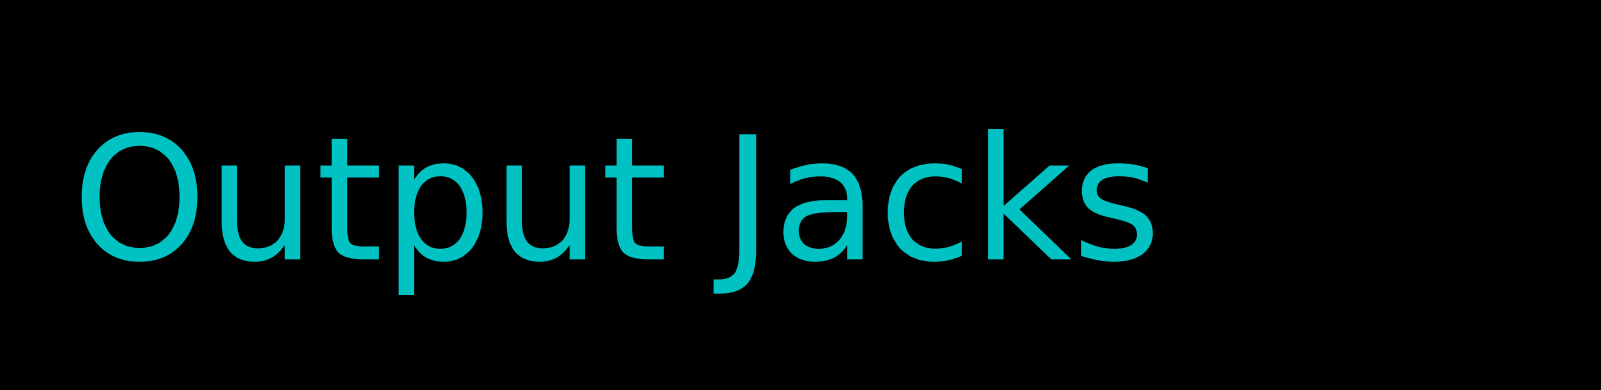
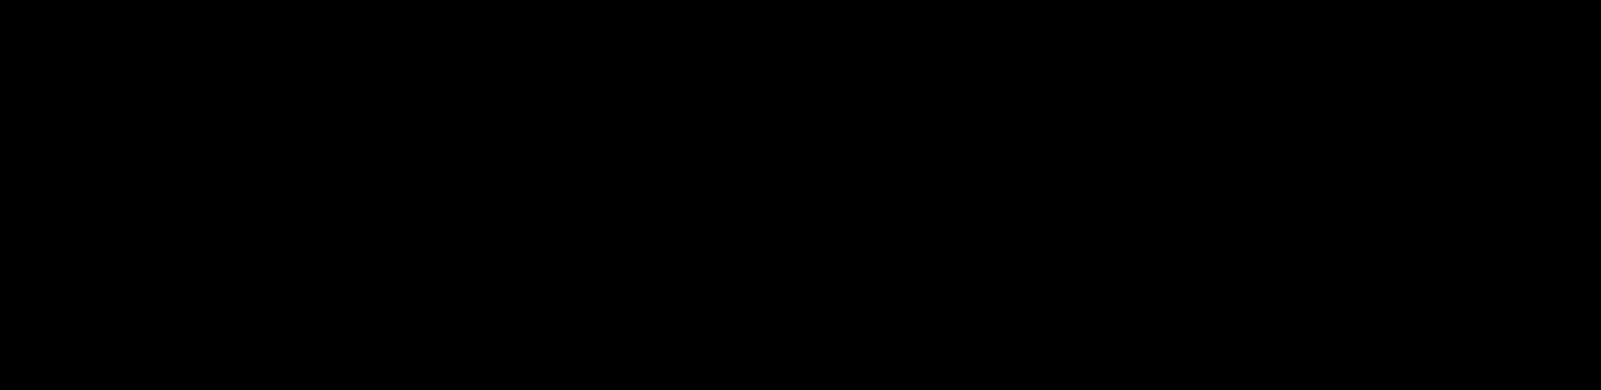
text: Output Jacks (617, 212) -> none

